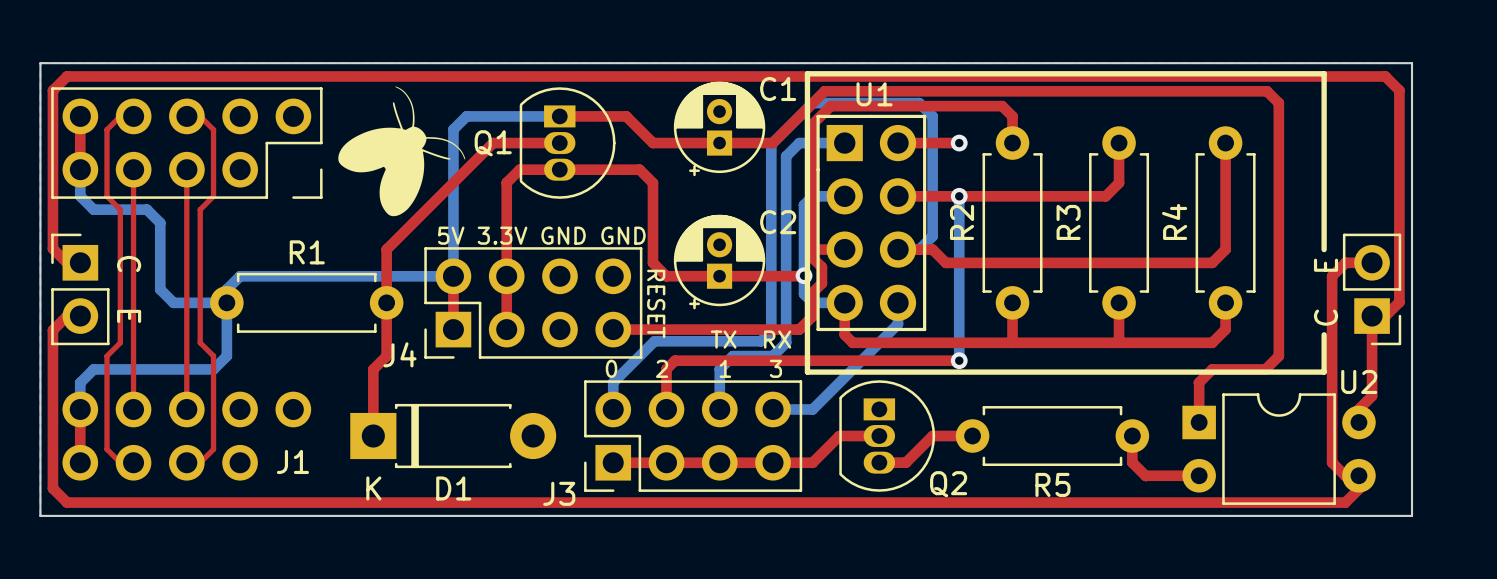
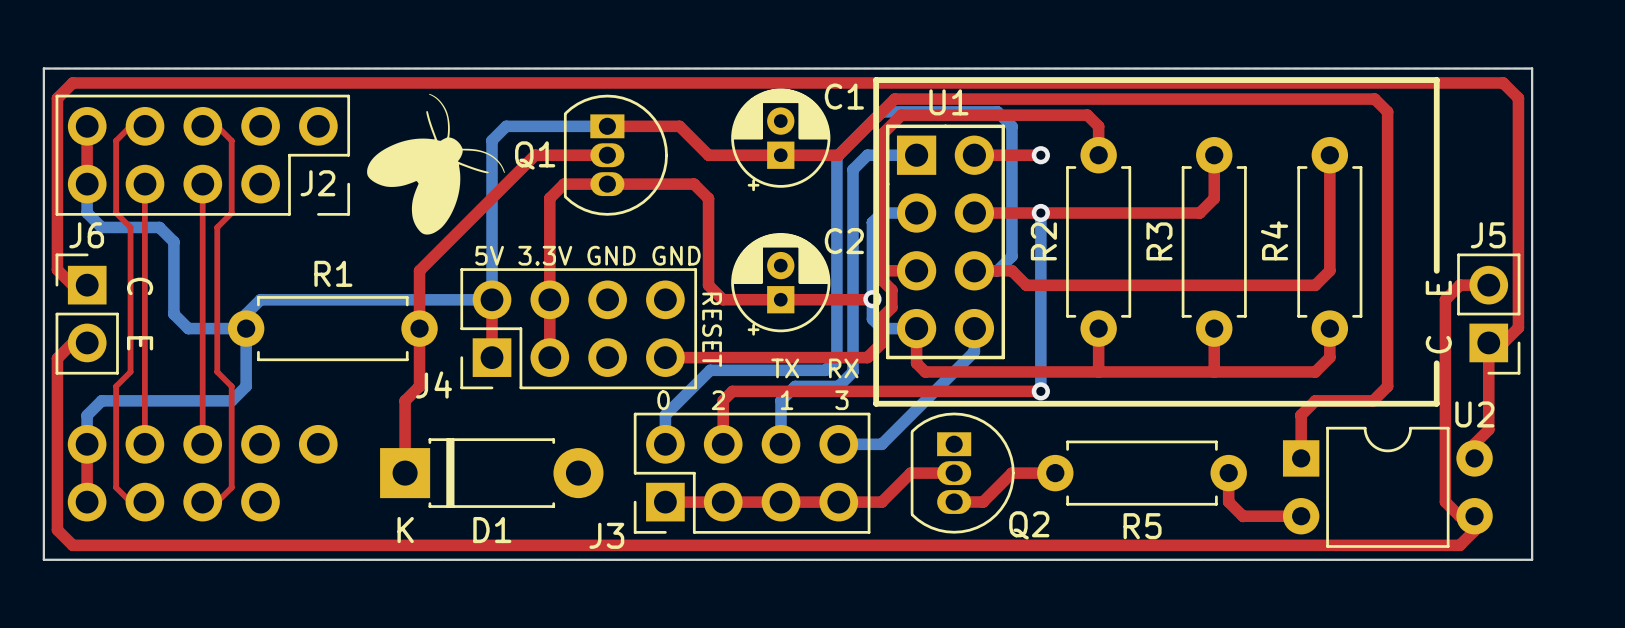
J2 name: none -> J2 (317, 183)
J6 name: none -> J6 (86, 235)
J5 name: none -> J5 (1488, 235)
J1 name: J1 (292, 461) -> none

